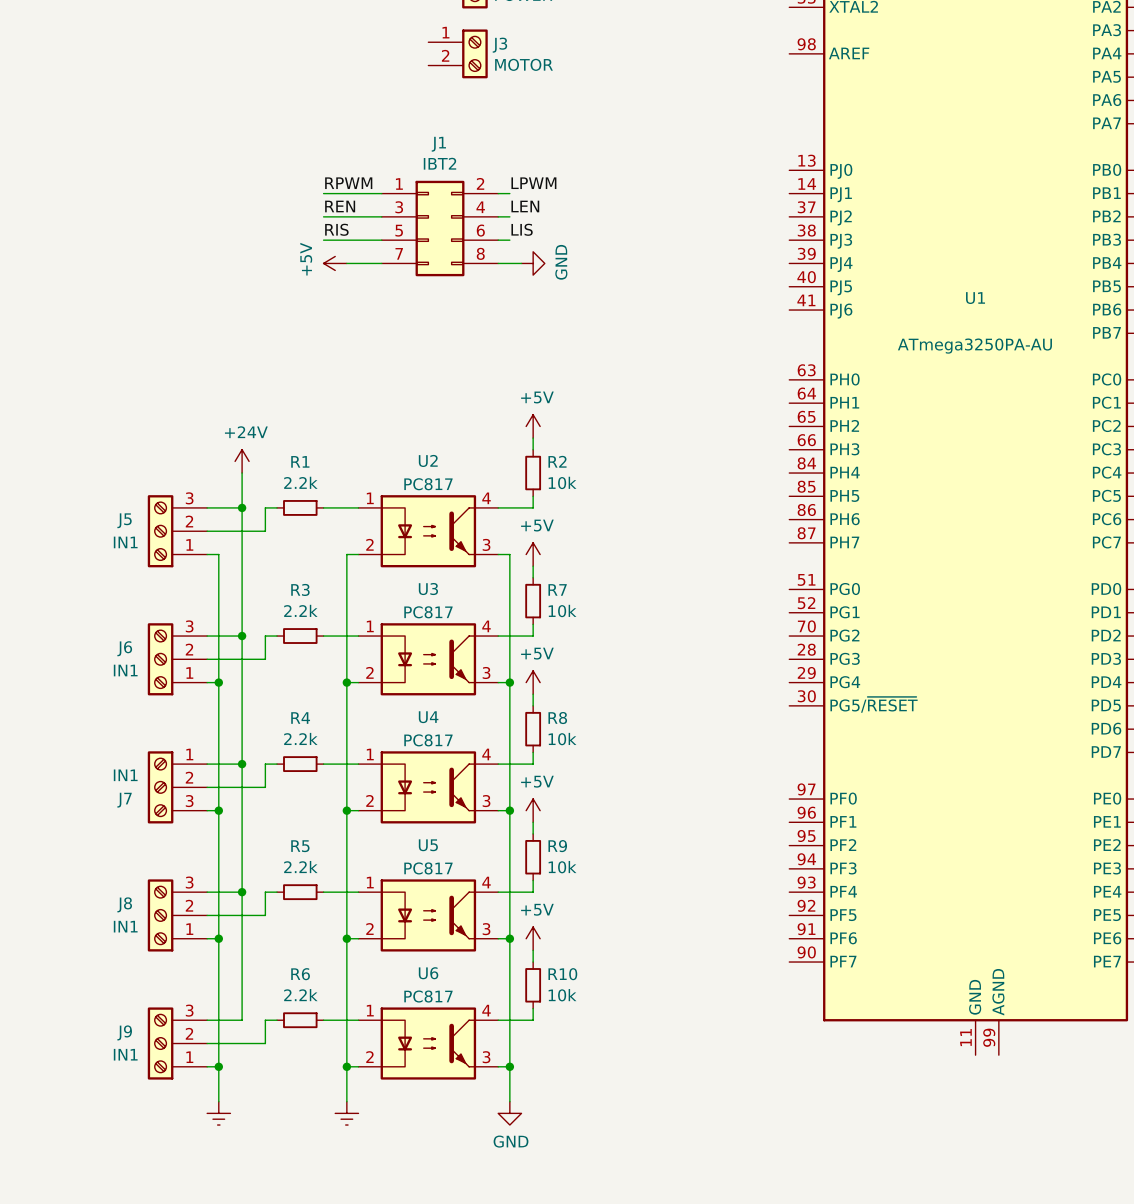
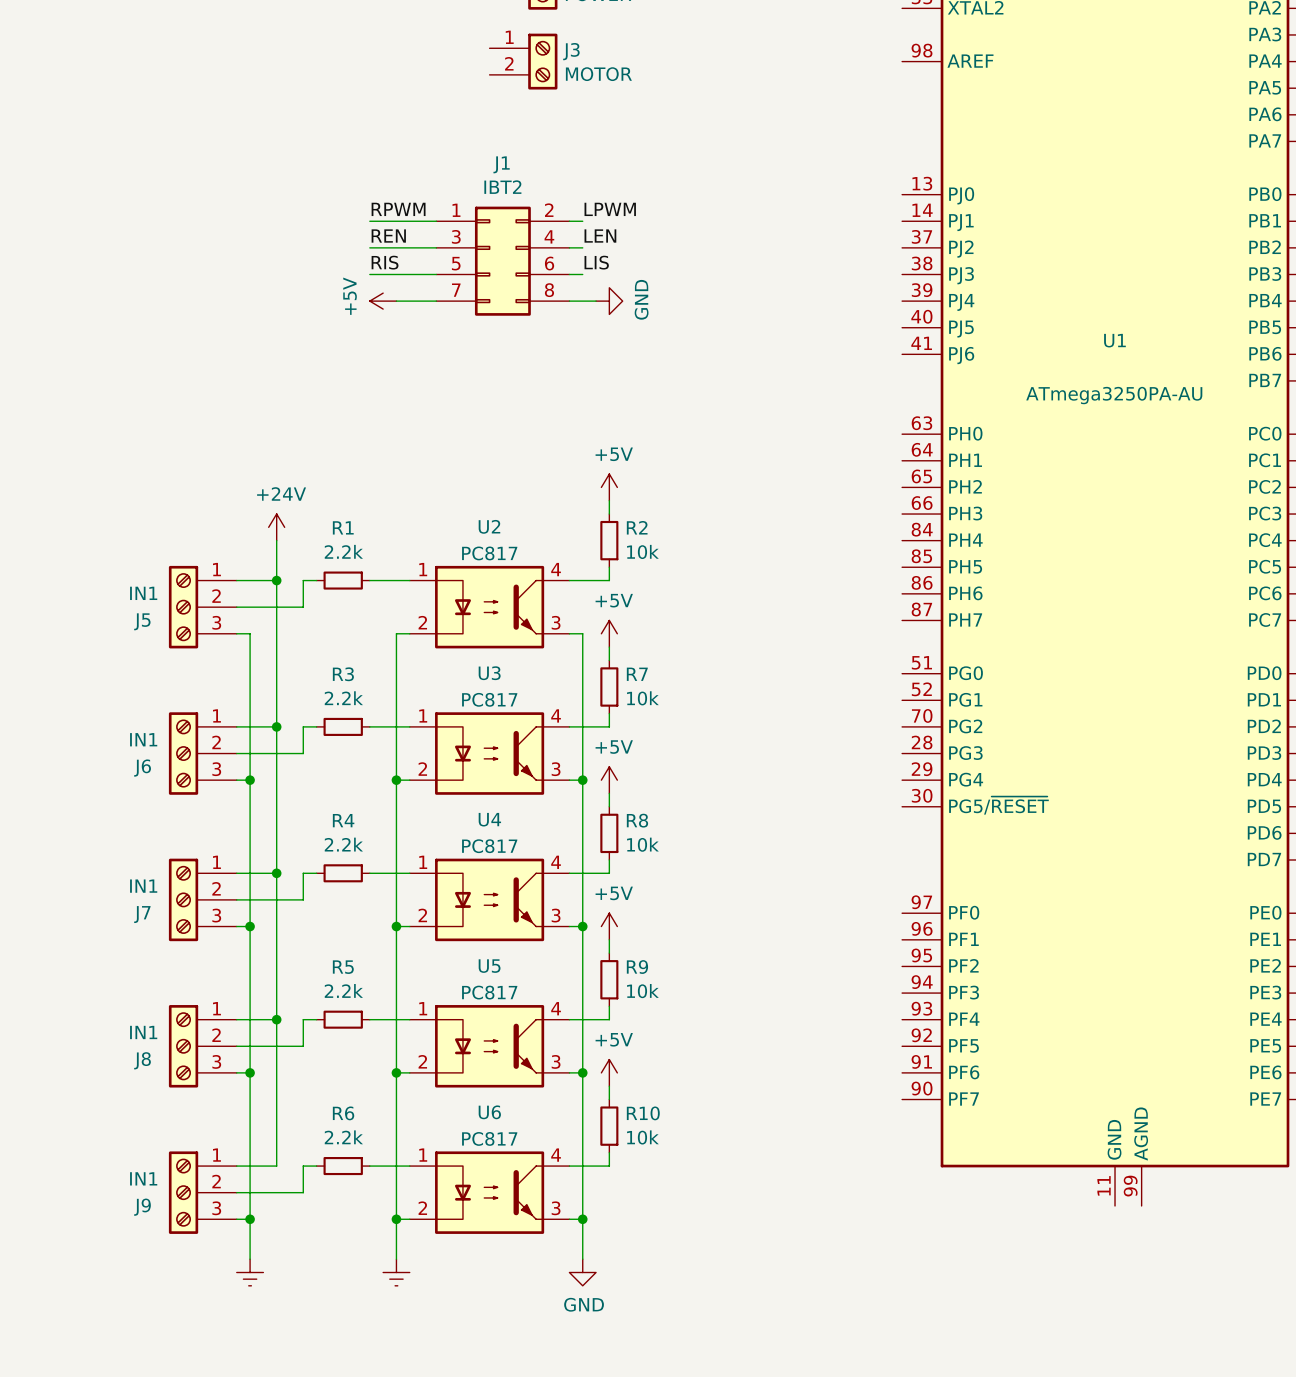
J5 flip: as is (160, 531) -> up-down (183, 607)
J6 flip: as is (160, 659) -> up-down (183, 753)
J8 flip: as is (160, 915) -> up-down (183, 1046)
J9 flip: as is (160, 1043) -> up-down (183, 1192)

